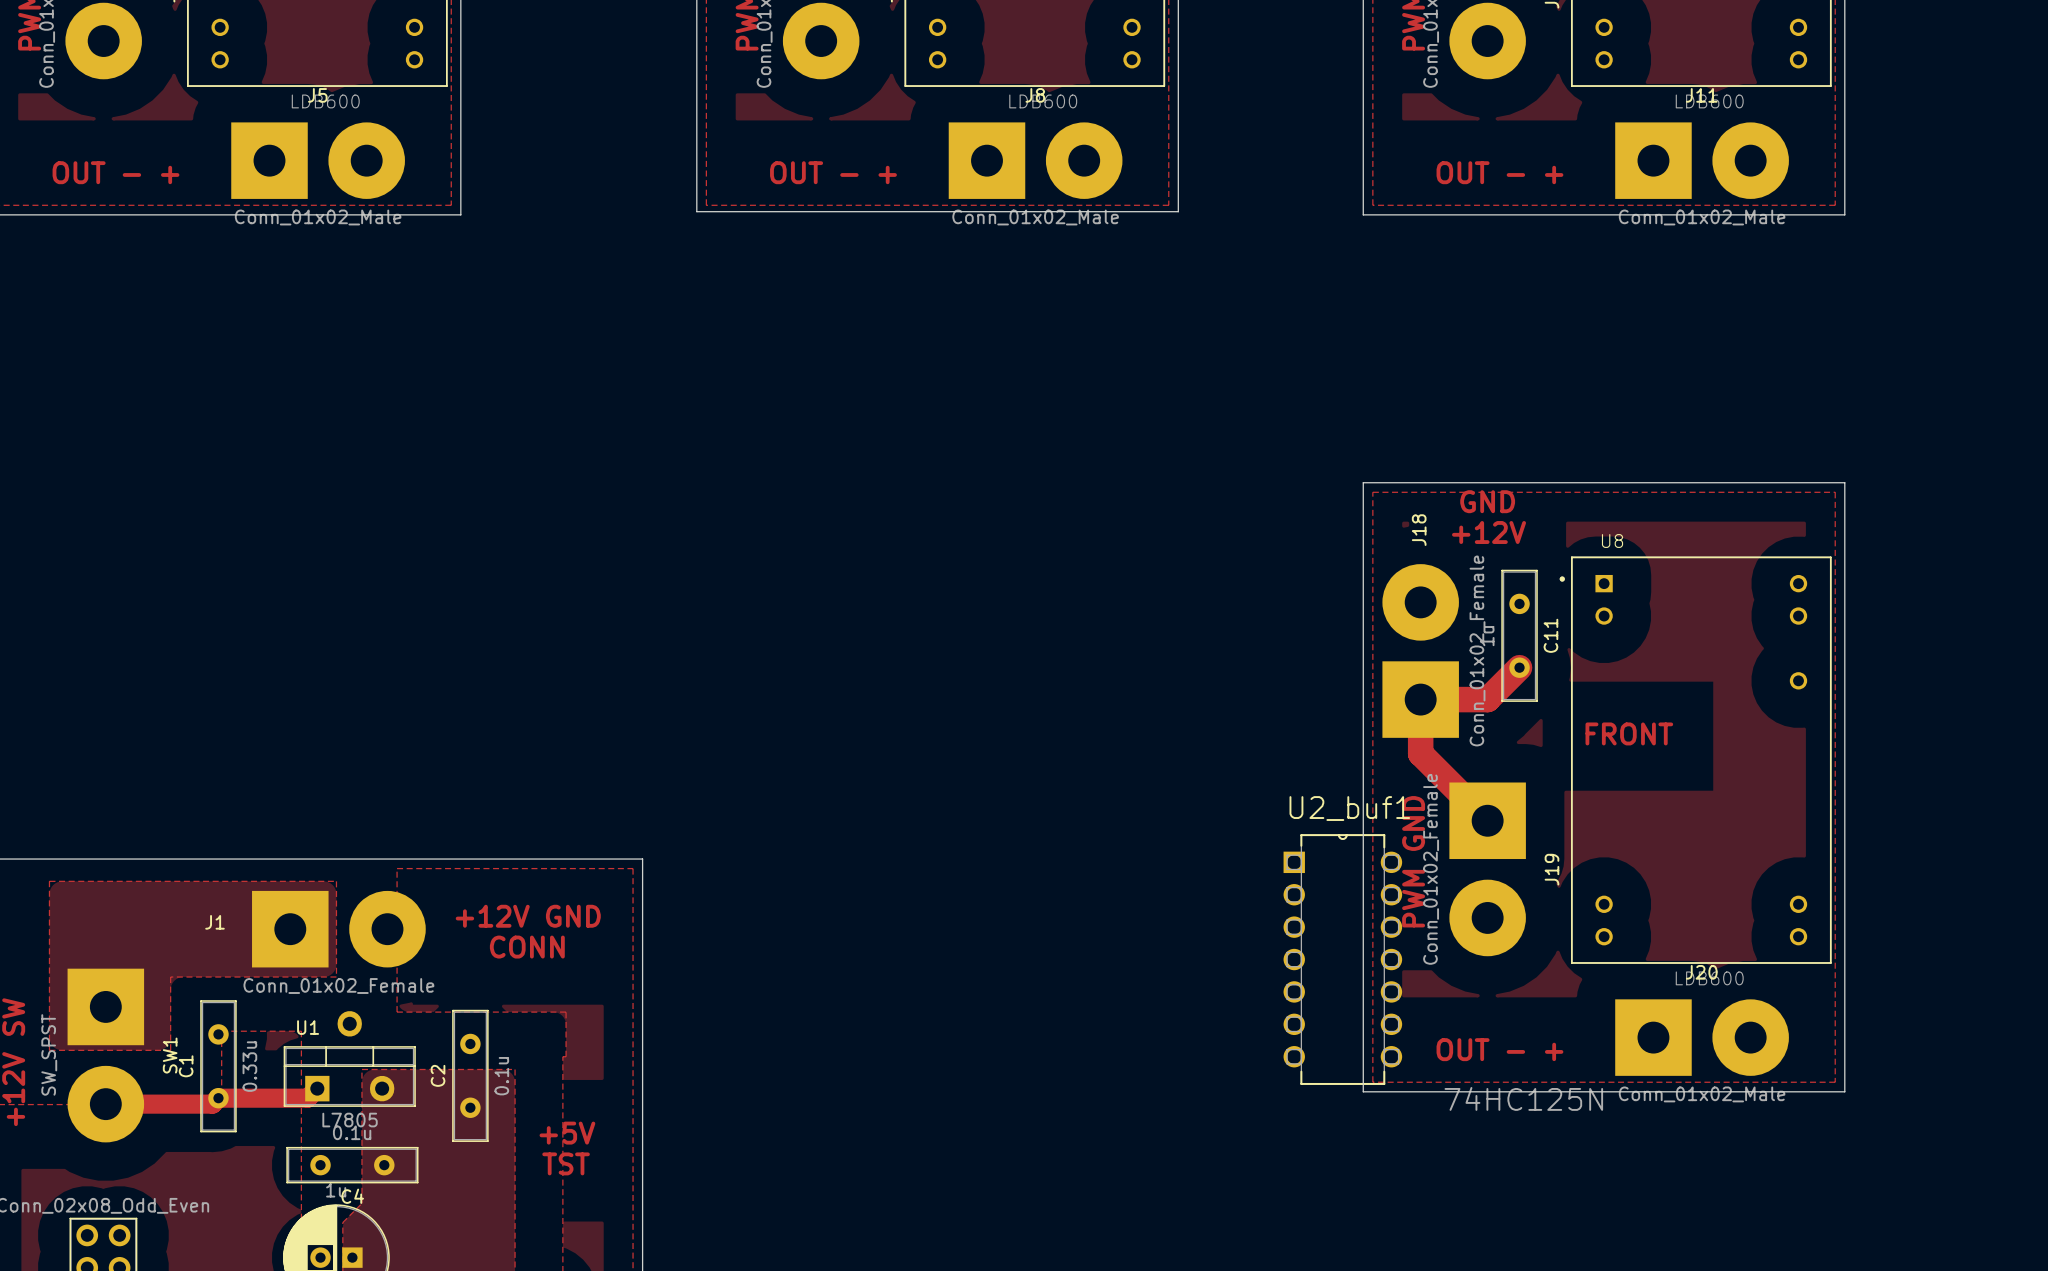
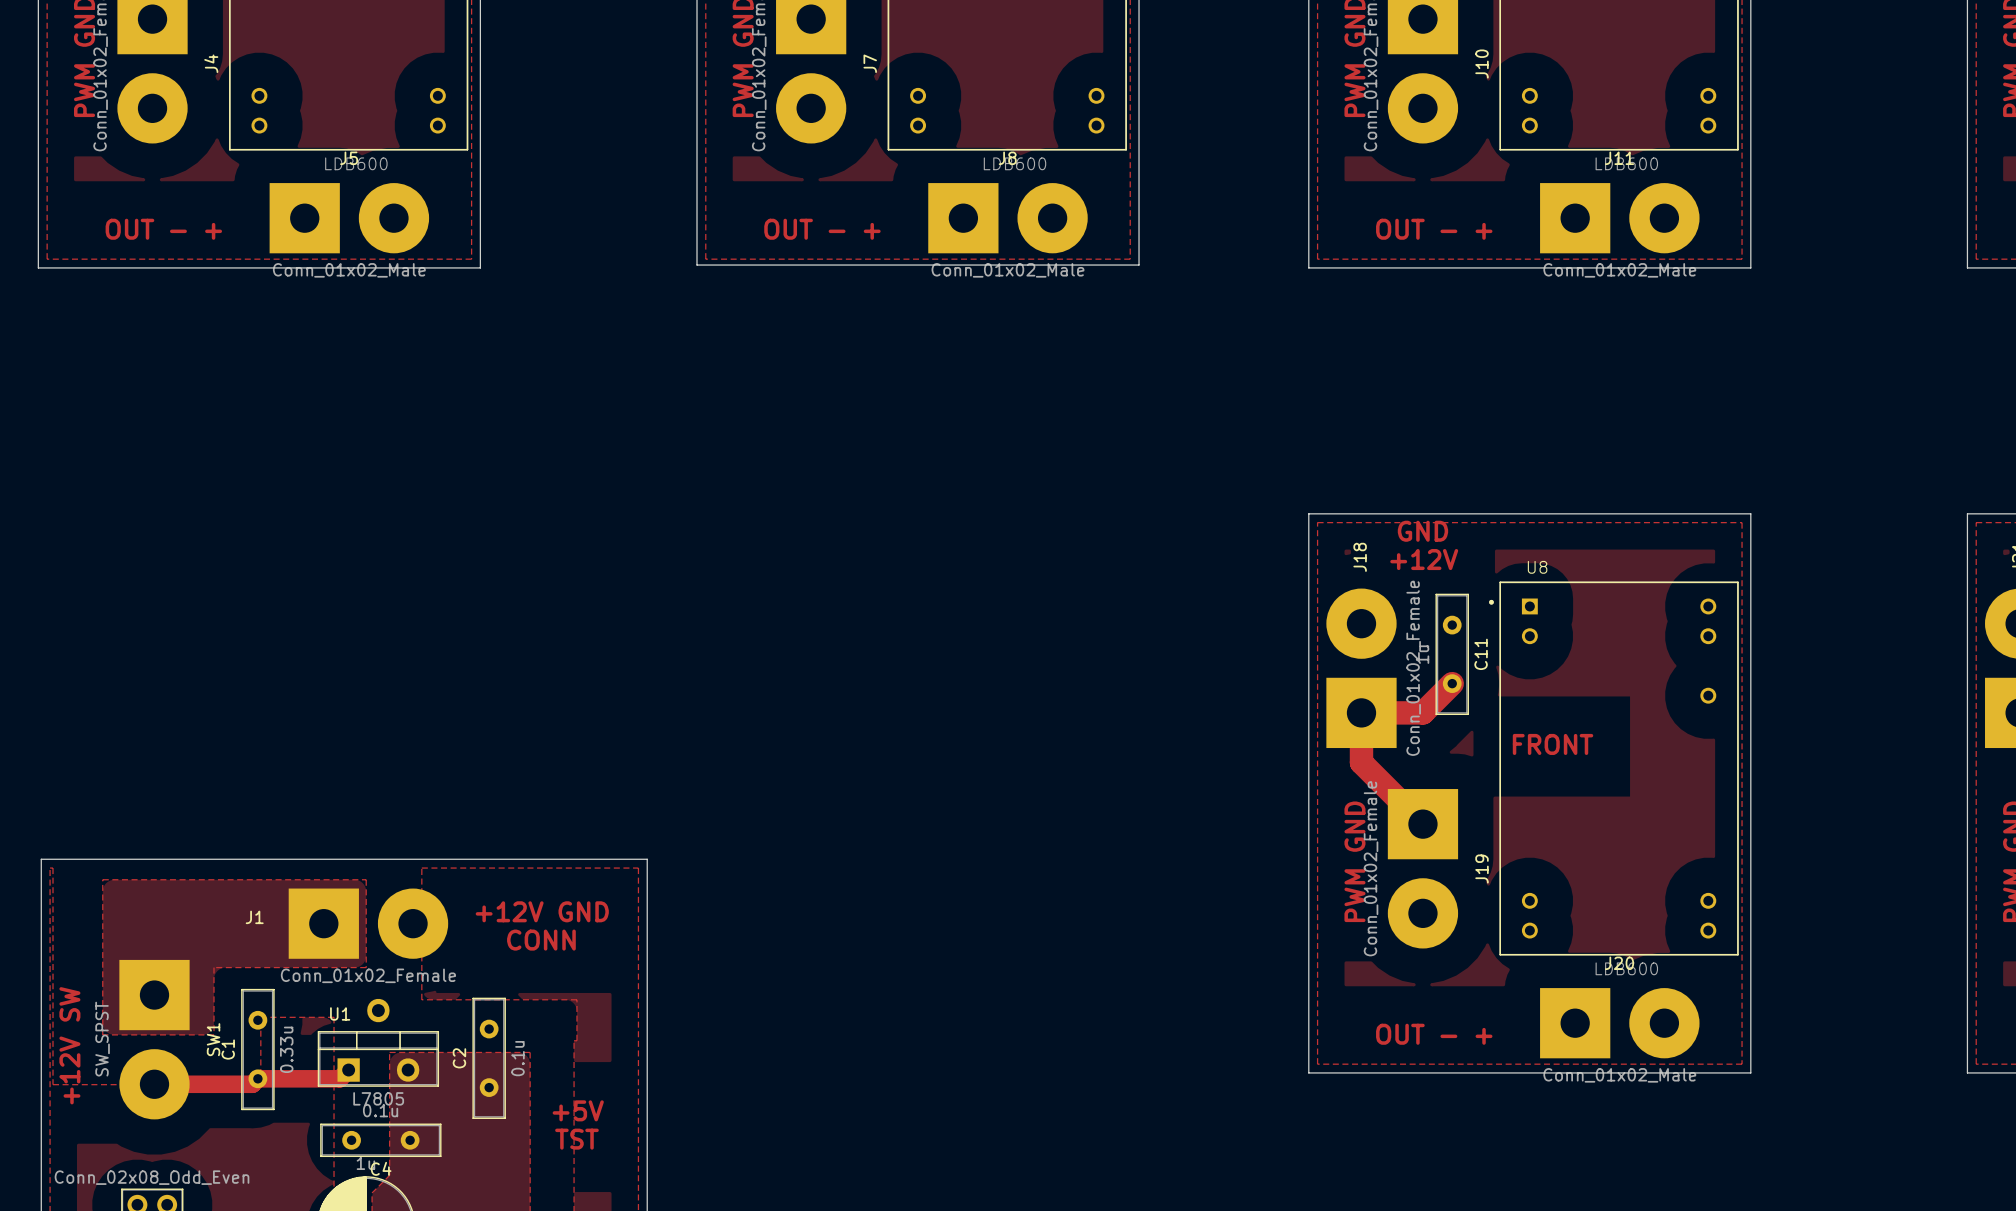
U2_buf1: 74HC125N (1342, 959) -> none

